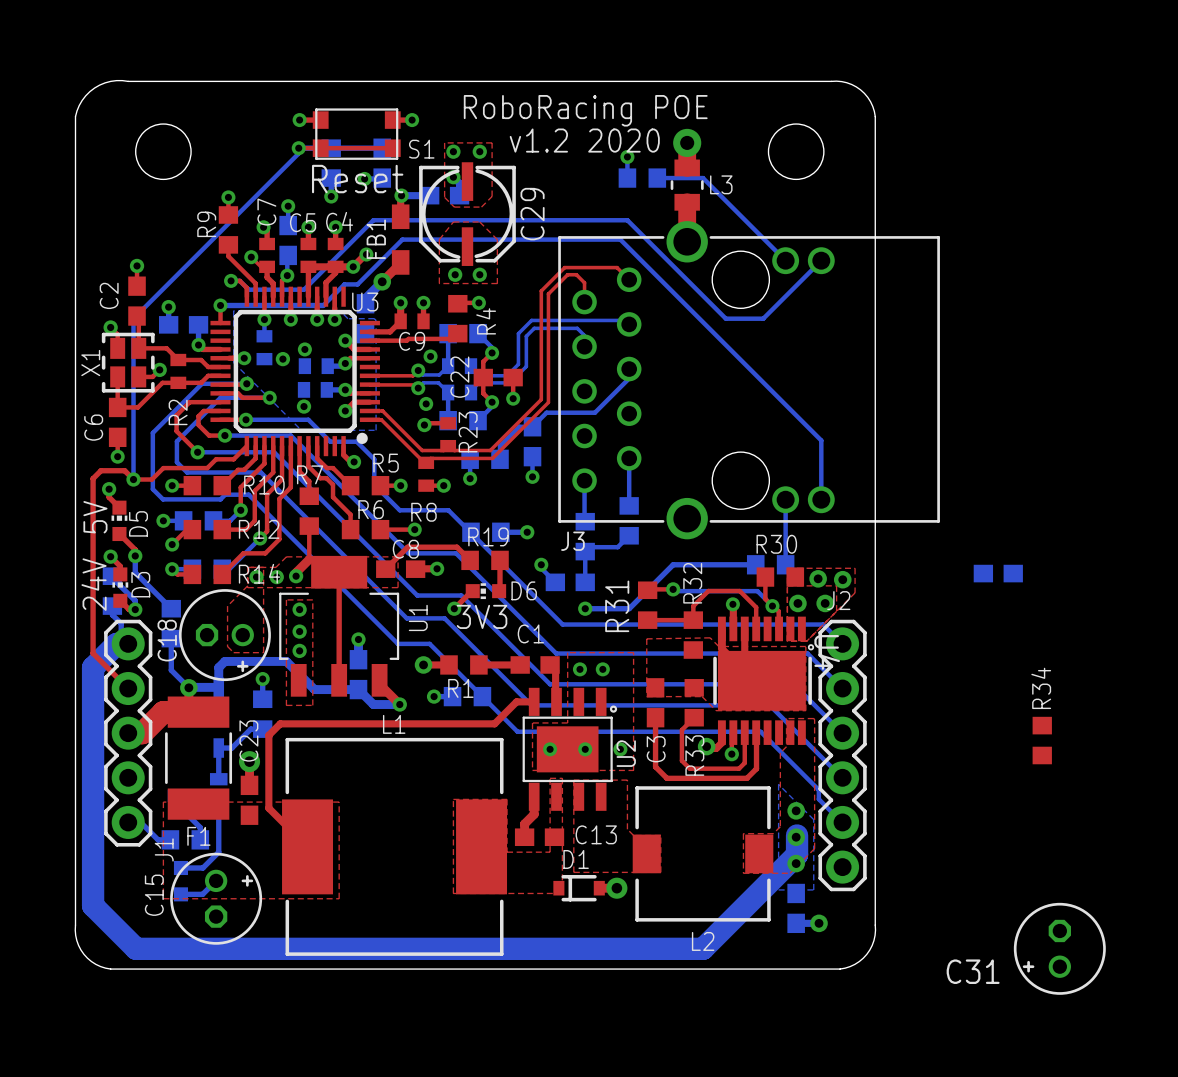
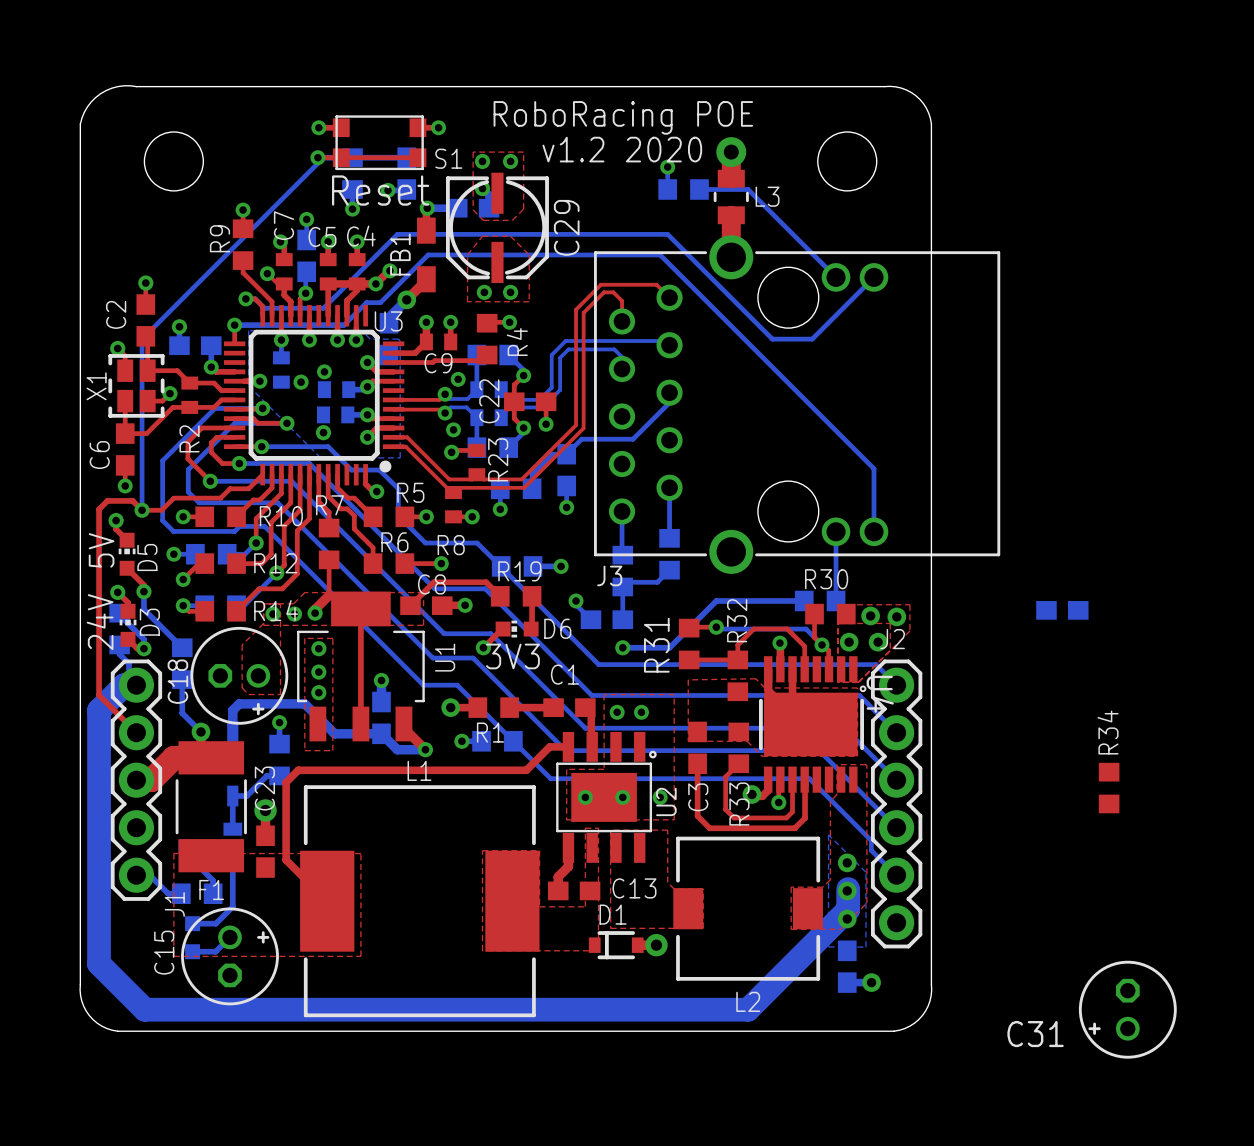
bottom track: (218, 687) (188, 687) -> none

